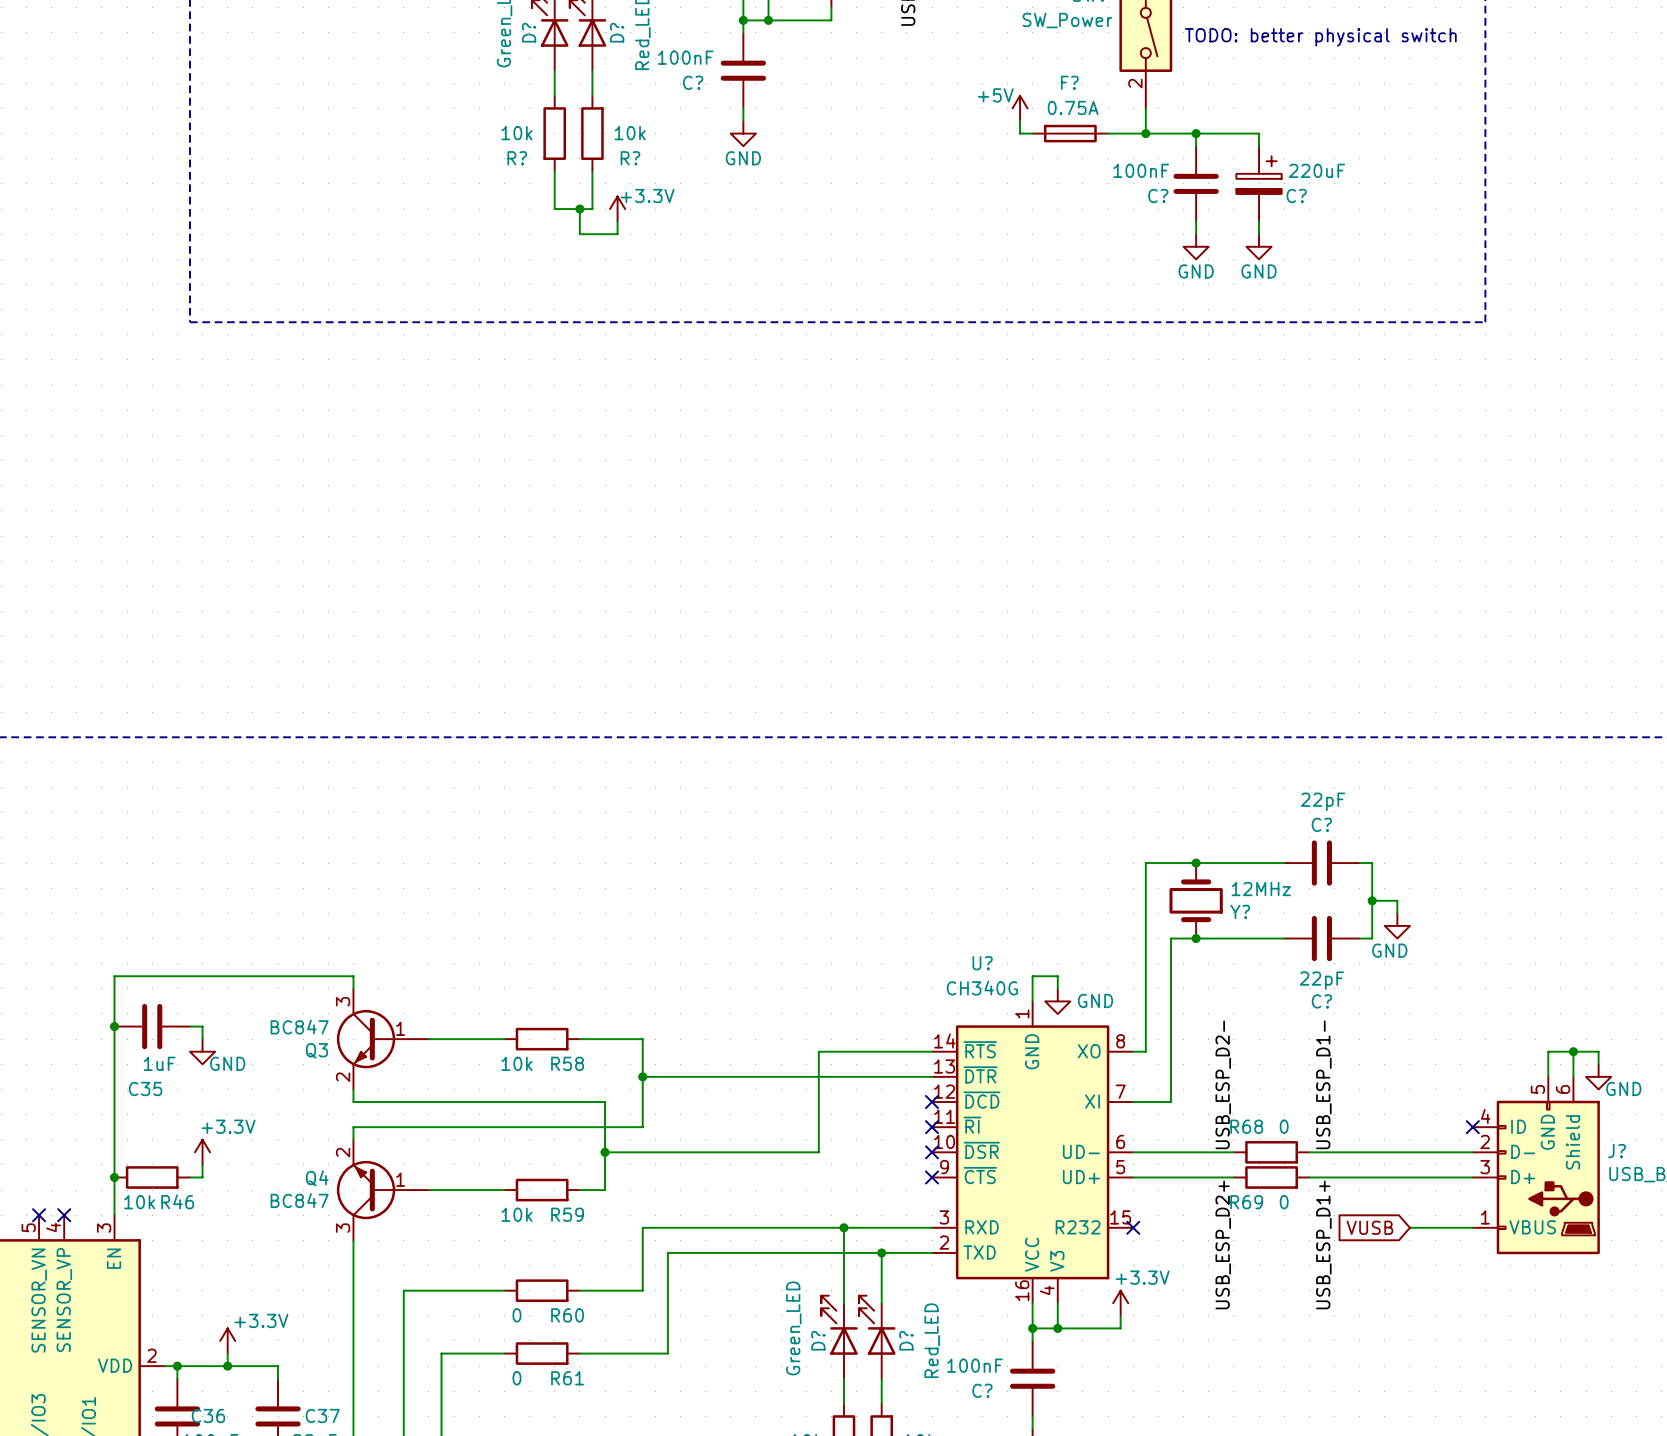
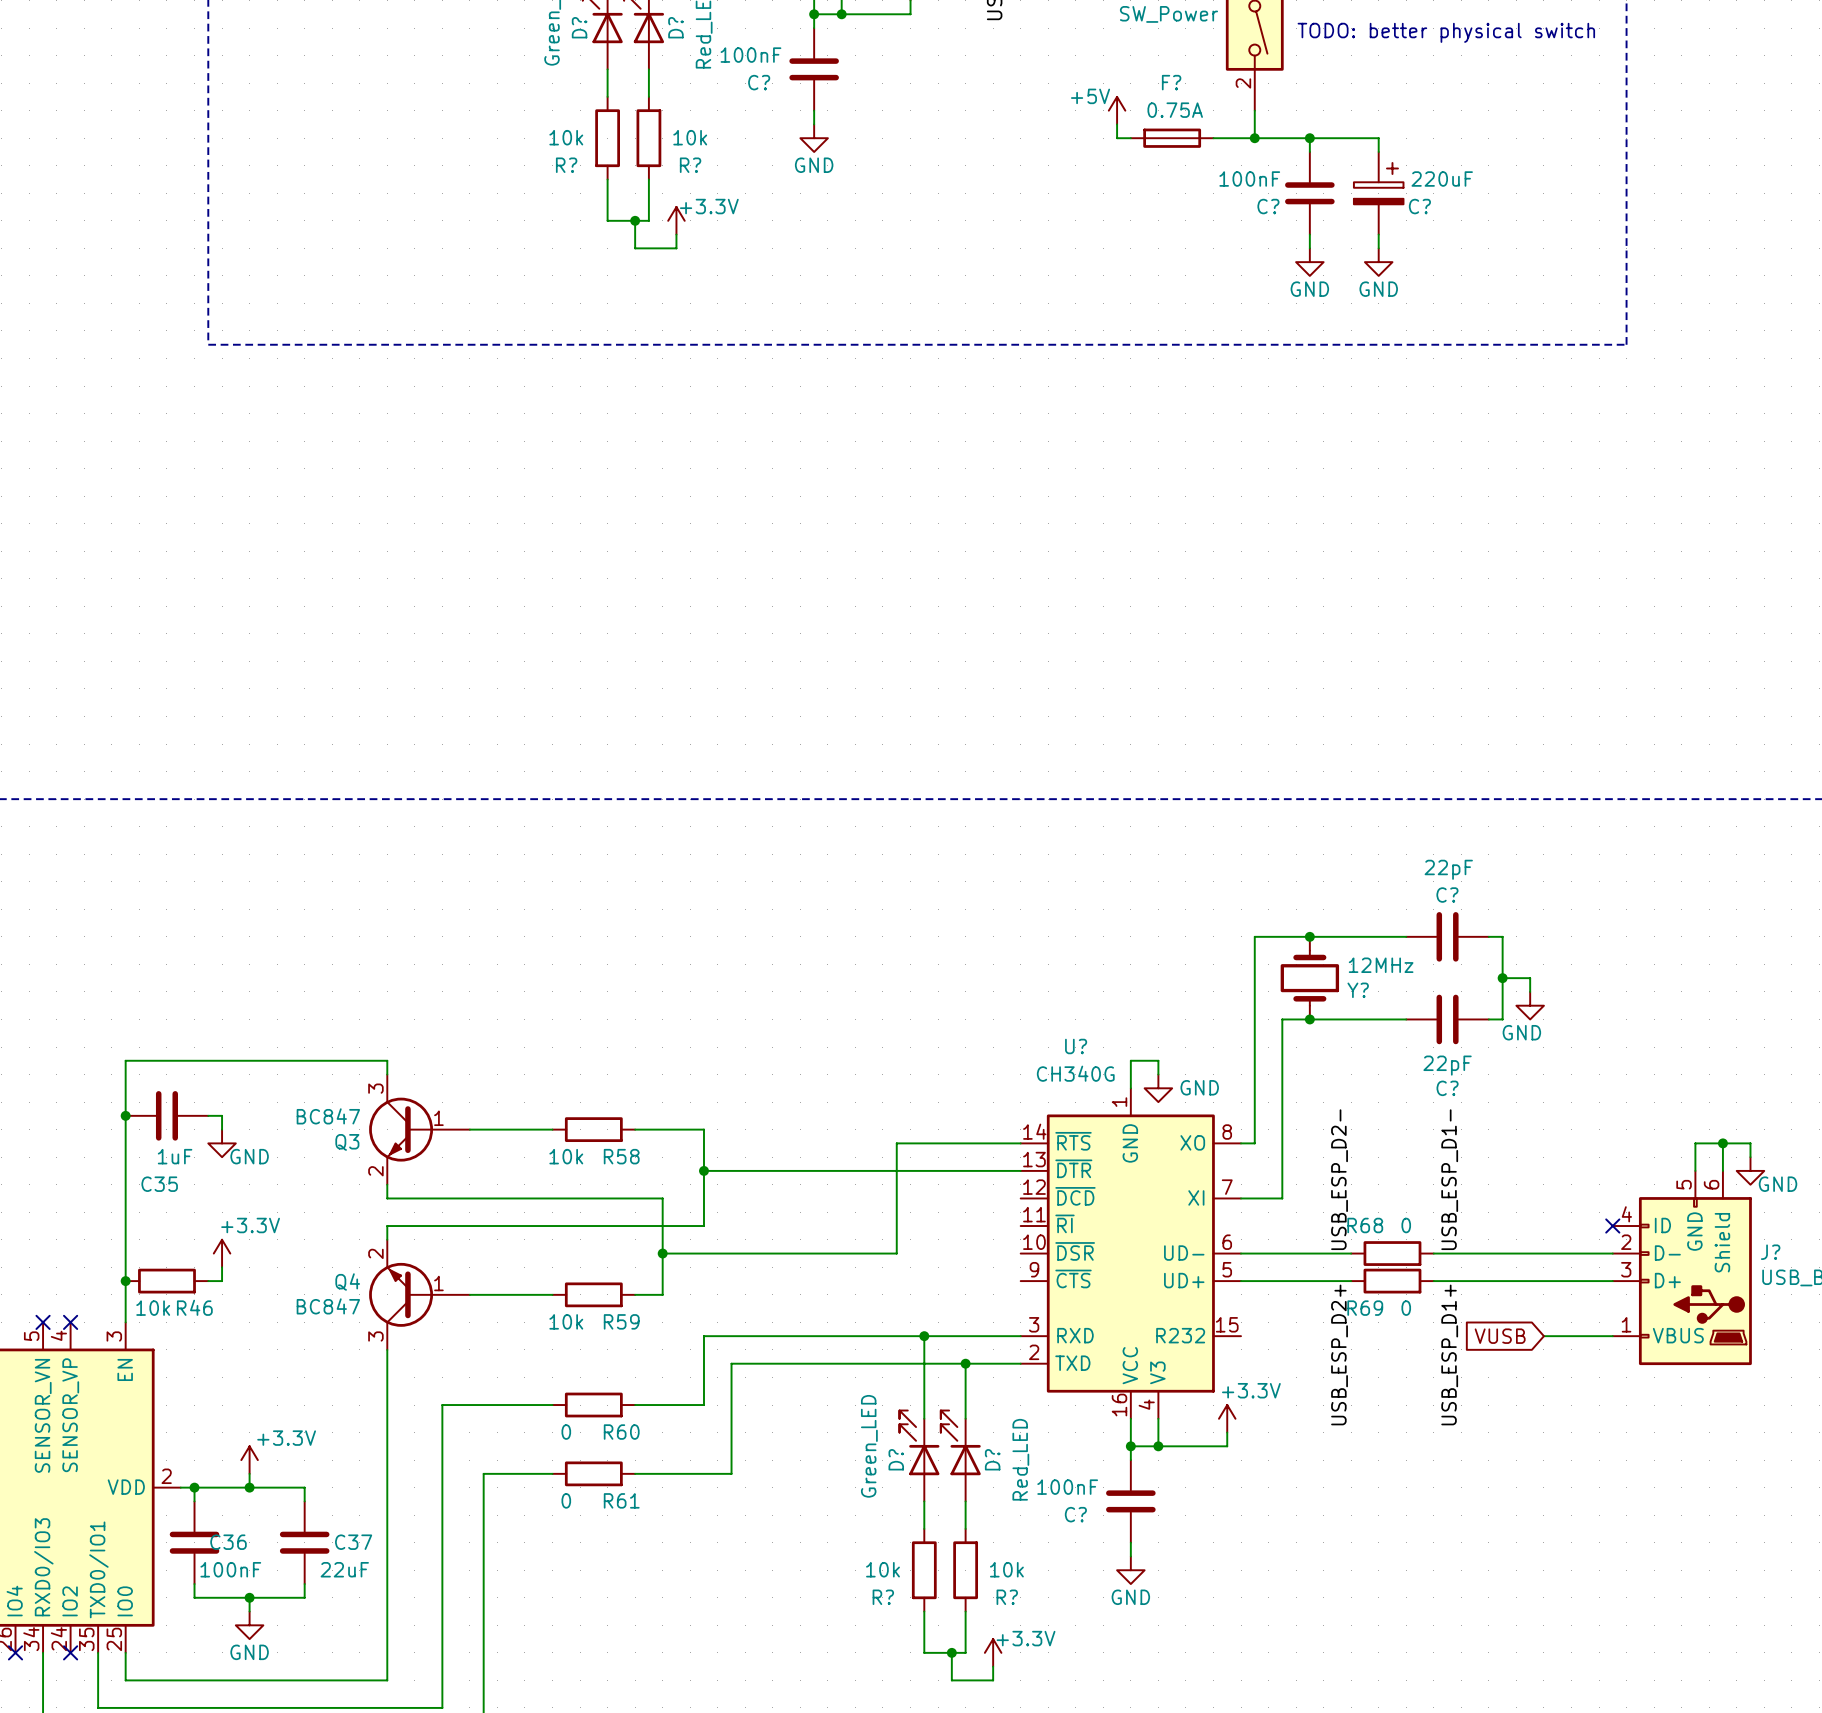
no-connect mark: (932, 1102) -> none
no-connect mark: (932, 1127) -> none
no-connect mark: (932, 1152) -> none
no-connect mark: (932, 1177) -> none
no-connect mark: (1133, 1227) -> none

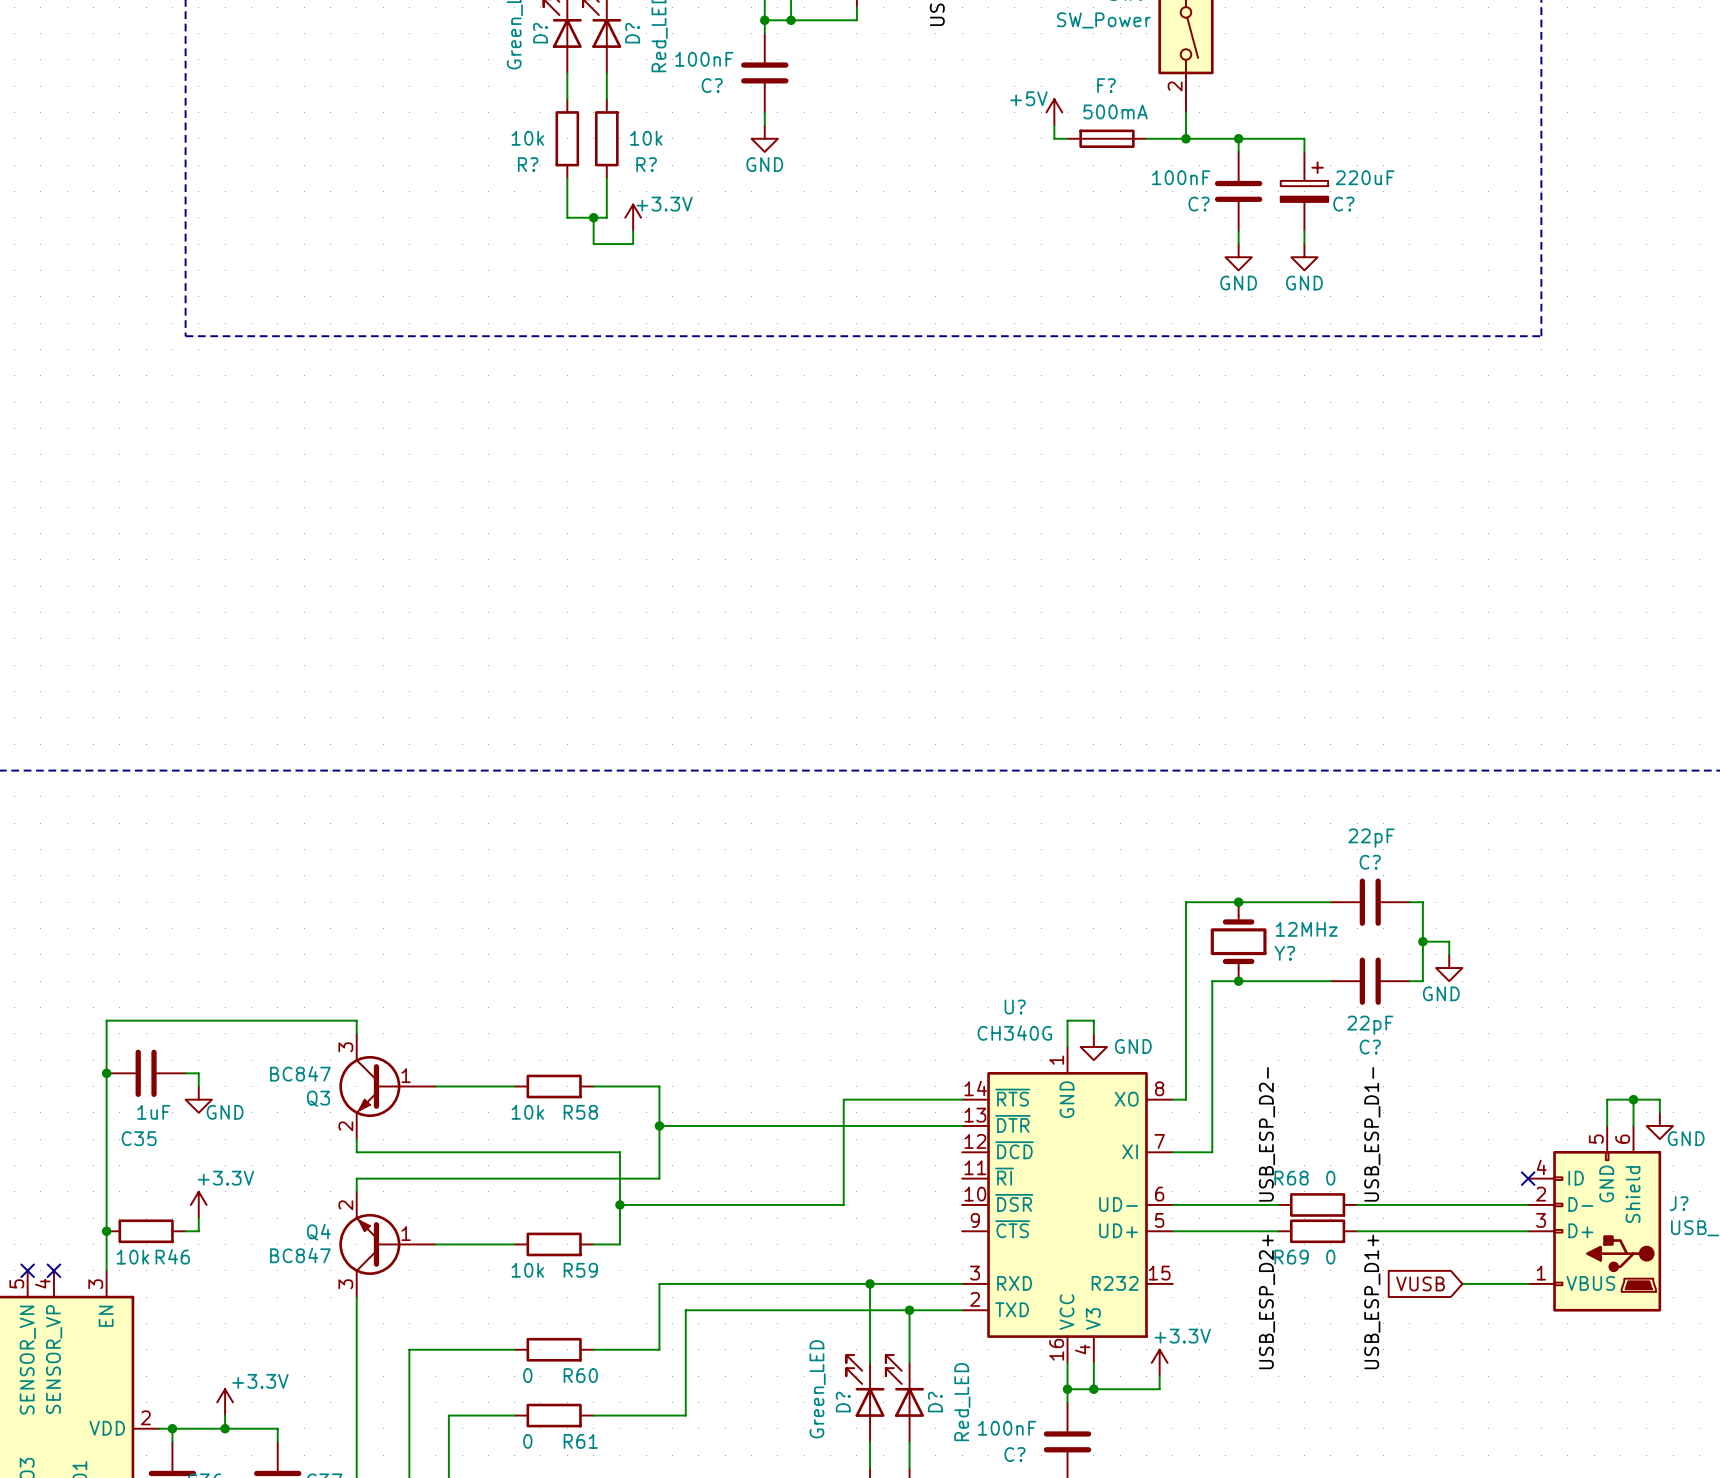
text: TODO: better physical switch (1446, 32) -> none
F? value: 0.75A (1175, 110) -> 500mA (1115, 111)

